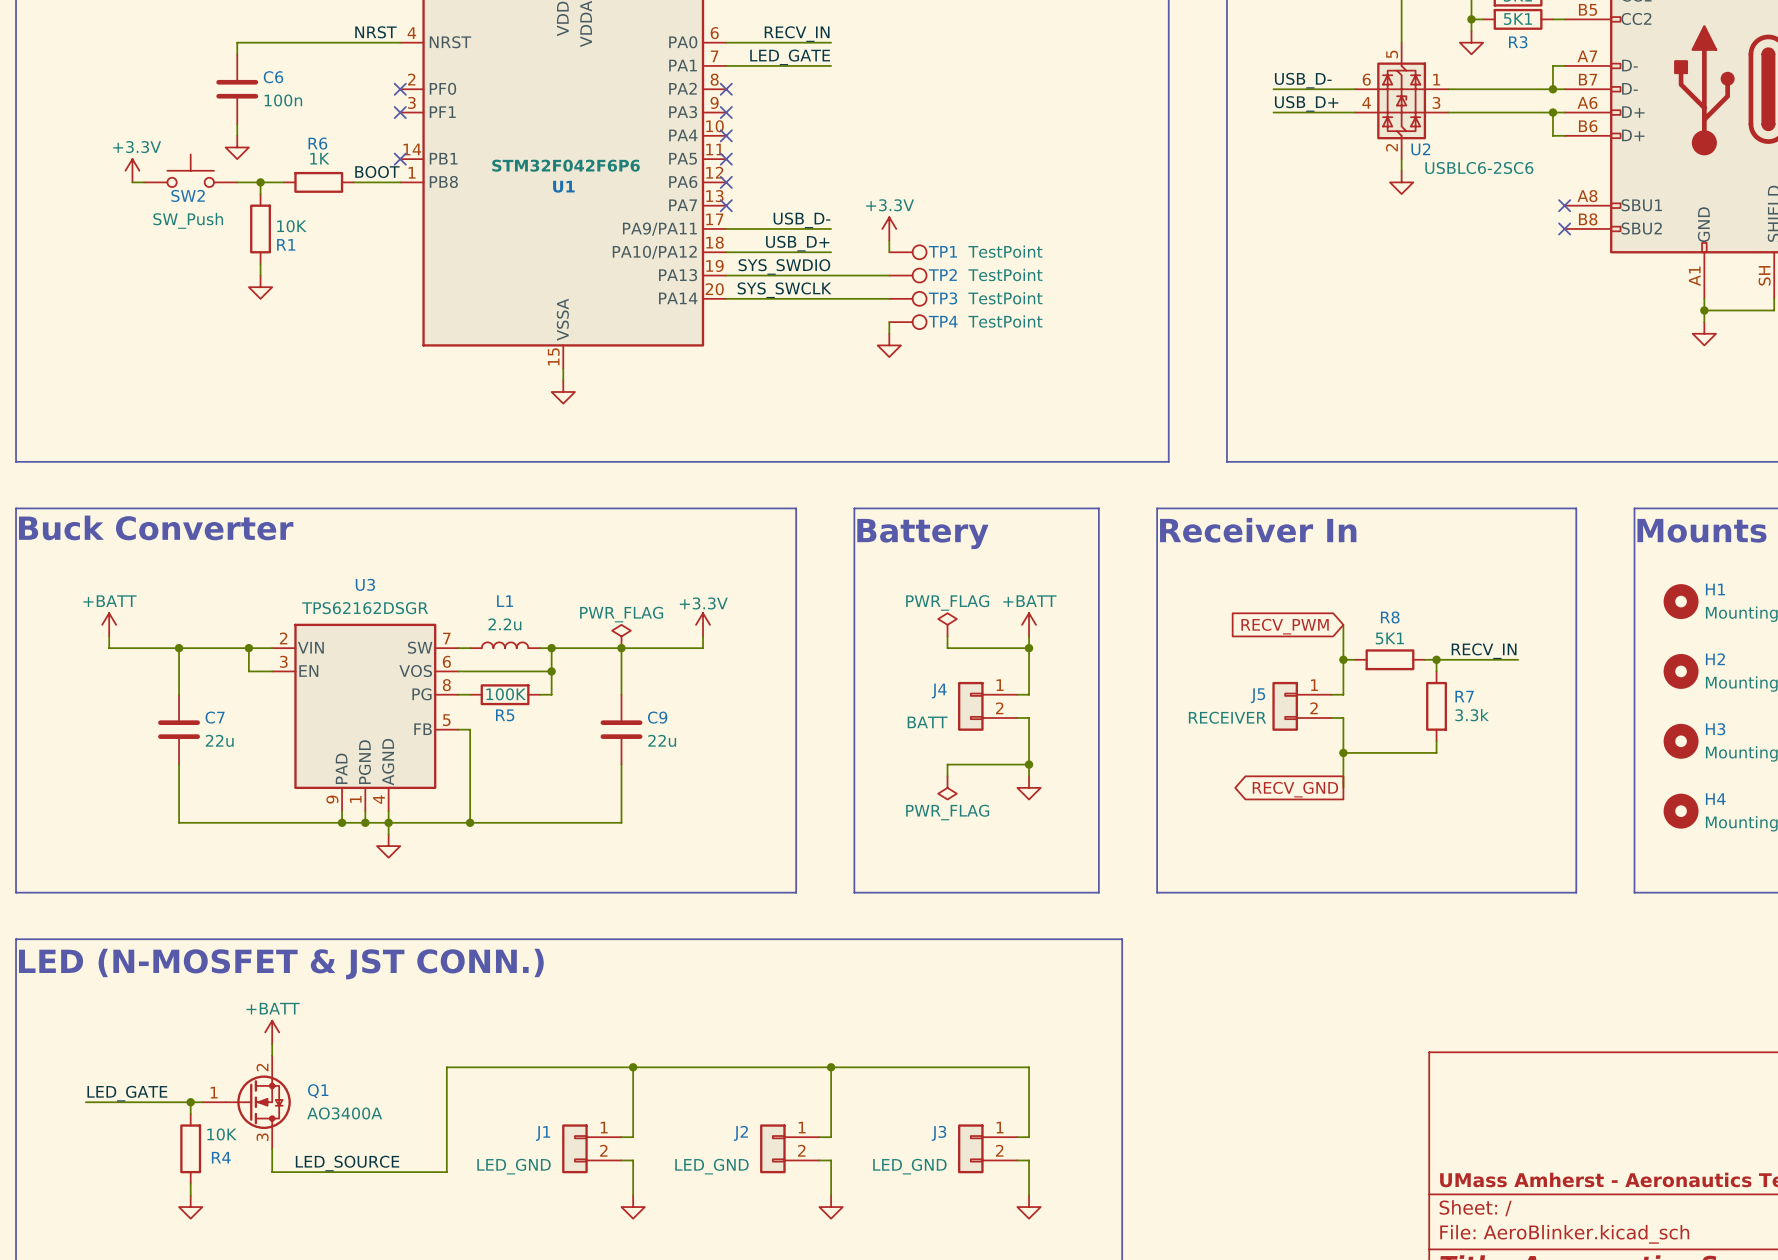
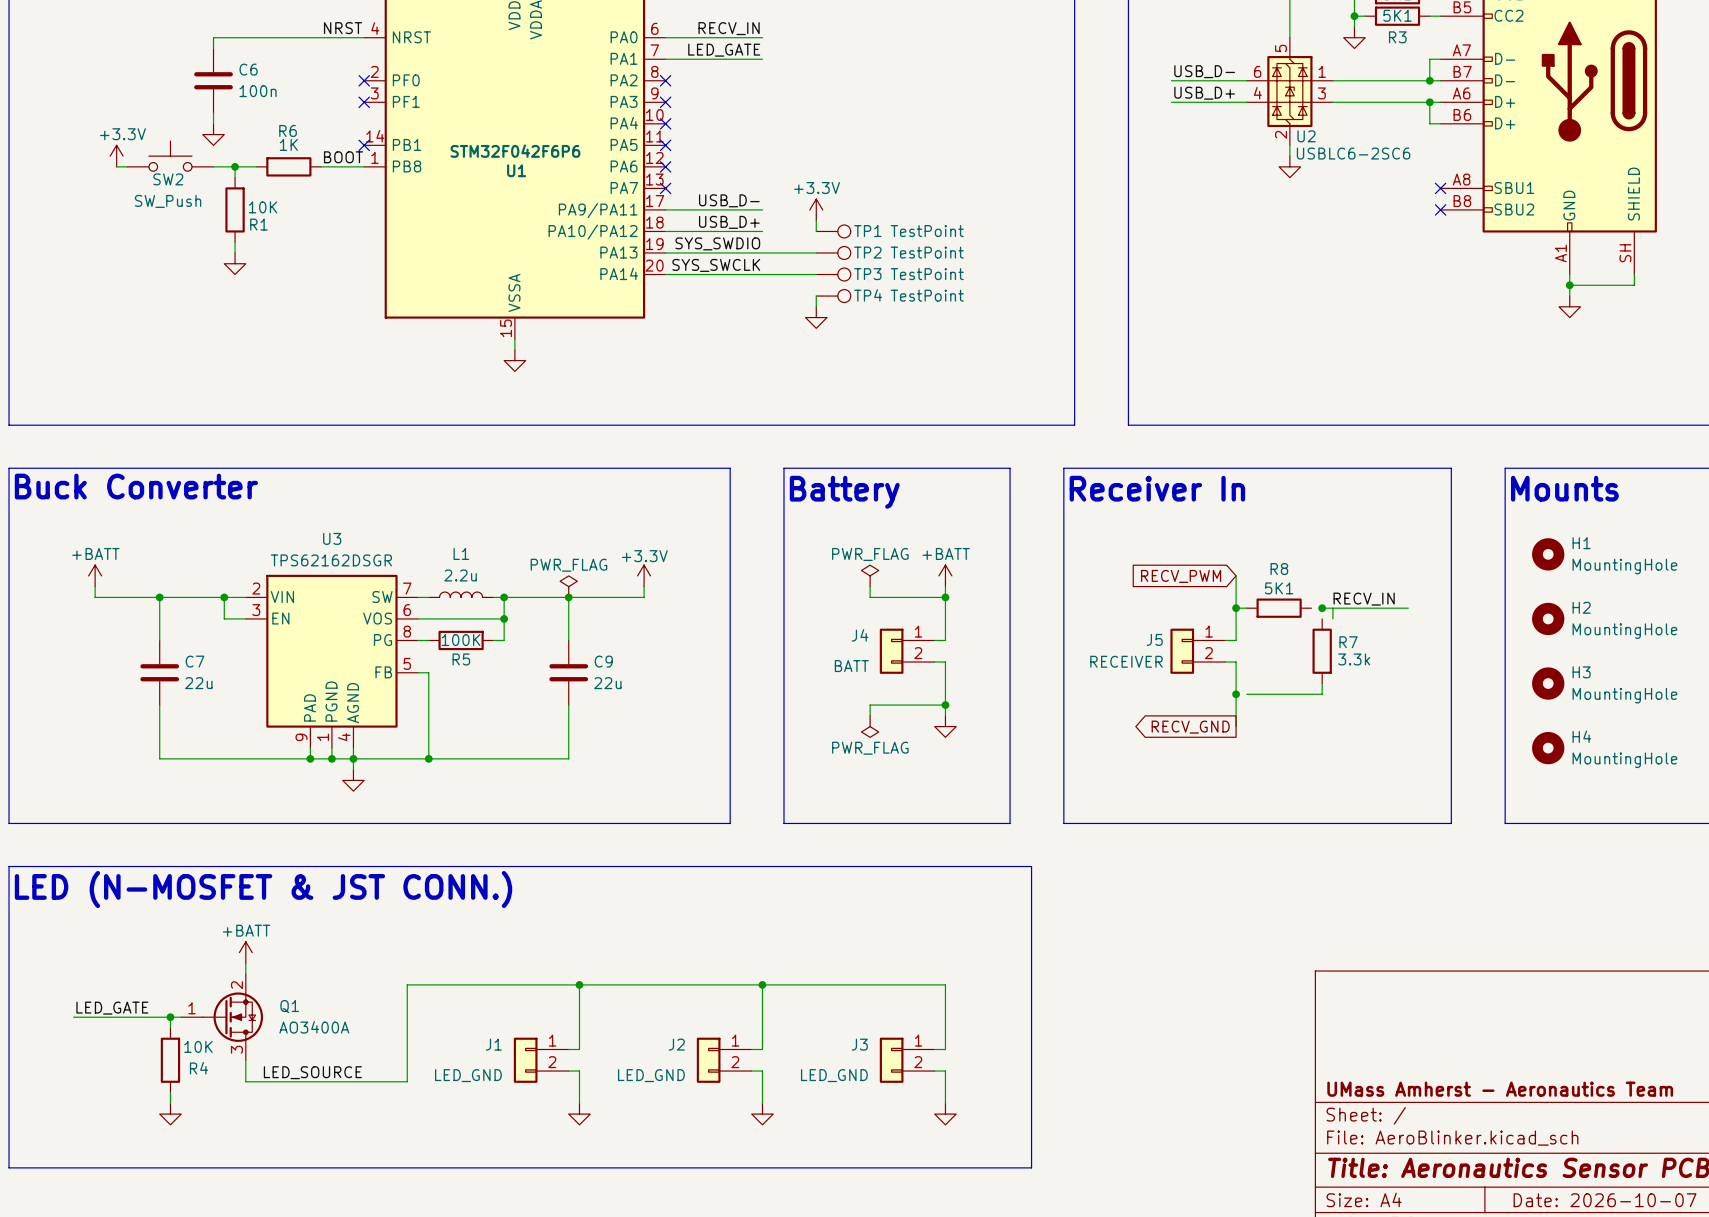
wire: (1424, 659) (1436, 659) (1436, 671) -> none
wire: none -> (1332, 608) (1332, 618)
wire: (1343, 752) (1355, 752) -> (1397, 608) (1408, 608)

